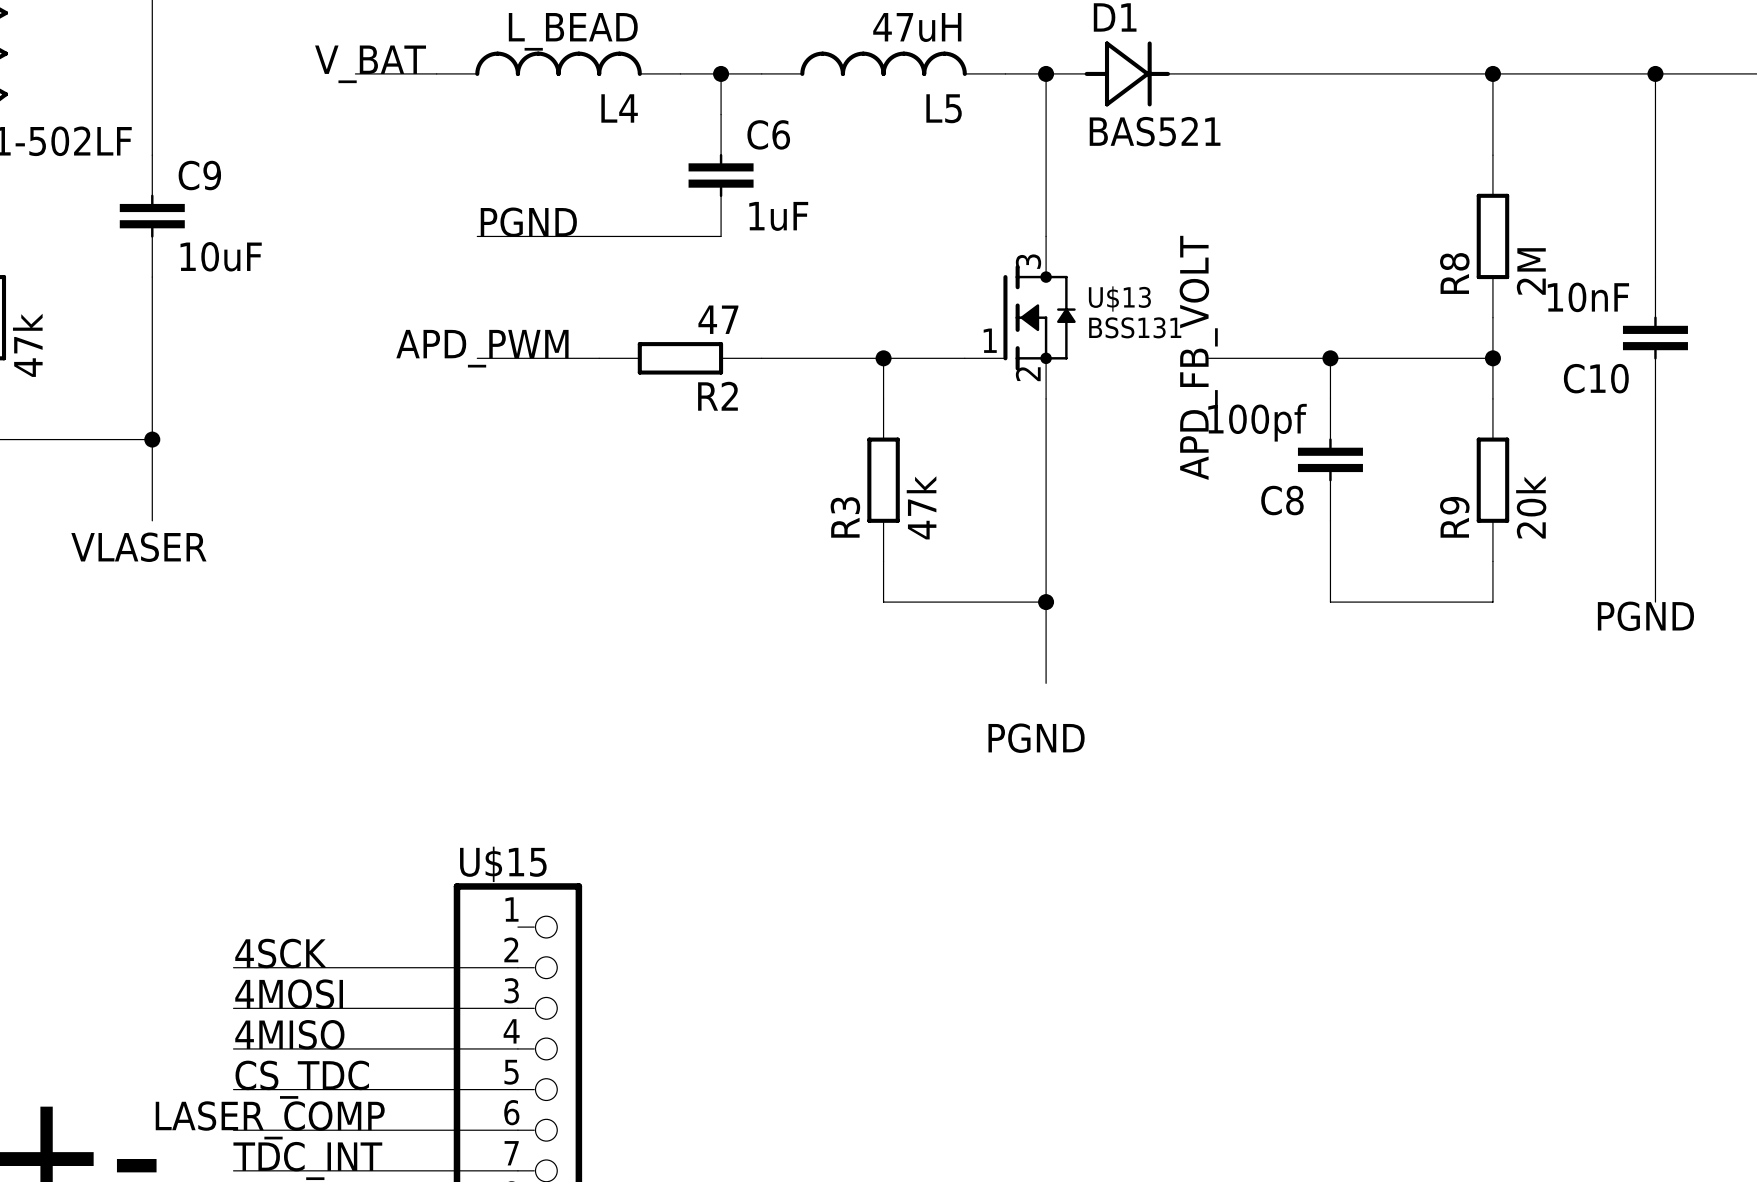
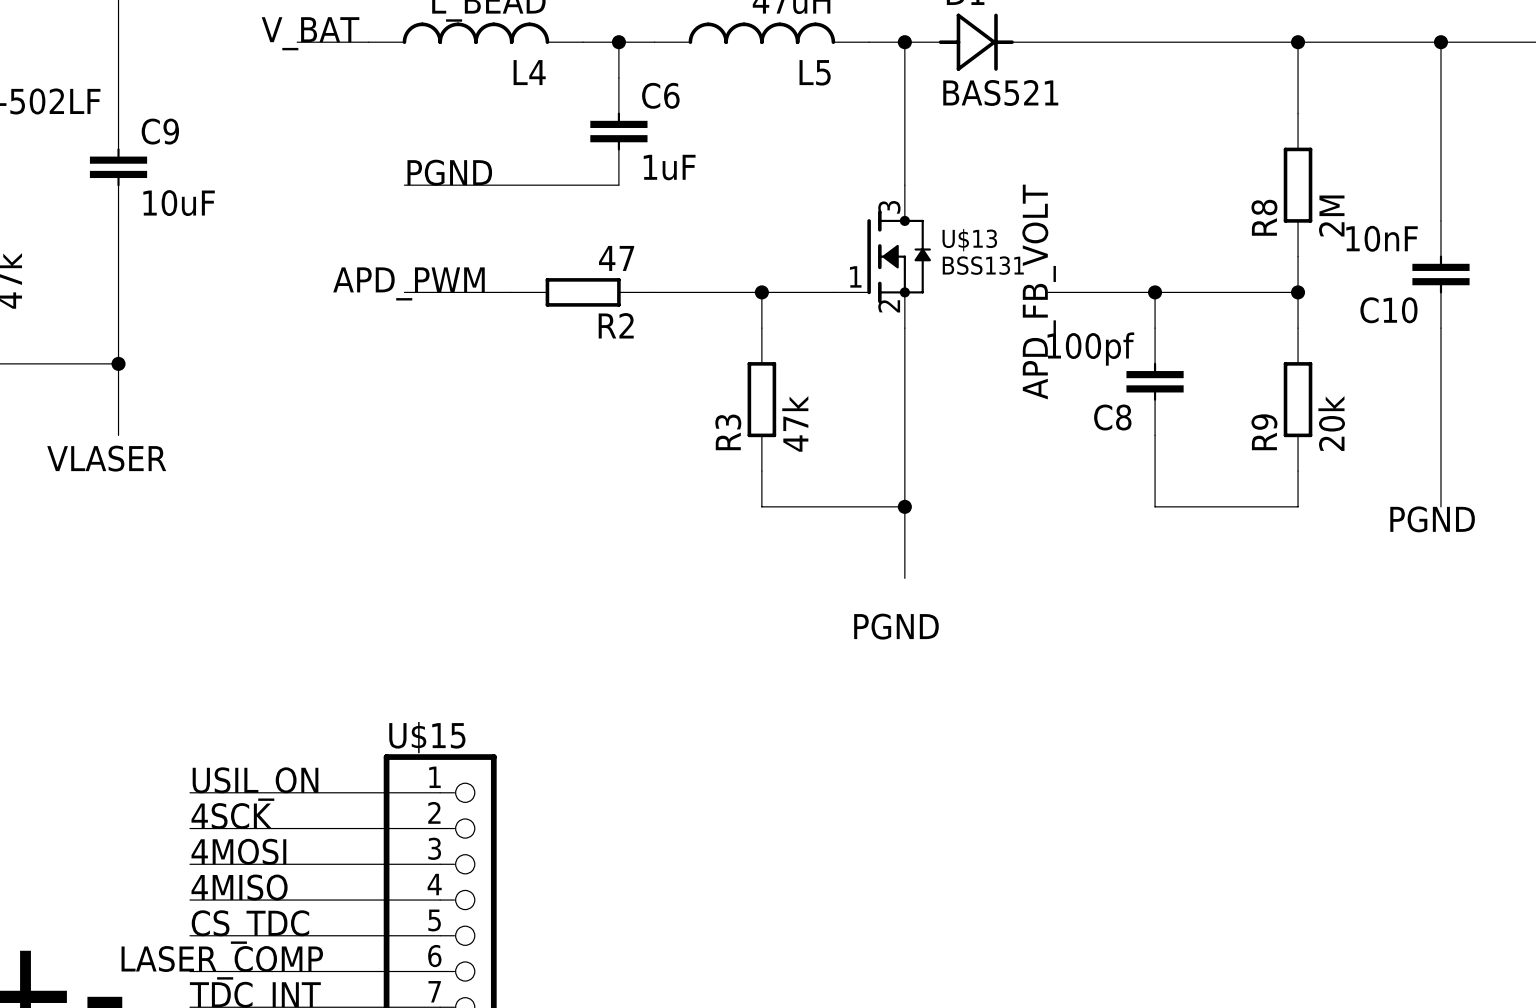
label: none -> USIL_ON (255, 784)
wire: none -> (190, 792) (440, 792)

